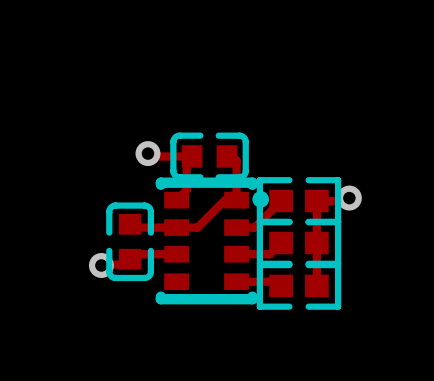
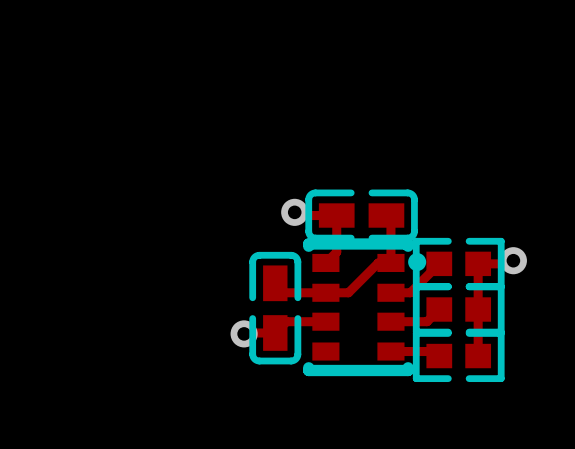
part footprint: [170, 132, 249, 181] -> [305, 189, 418, 242]
part footprint: [106, 202, 155, 282] -> [249, 251, 302, 365]

